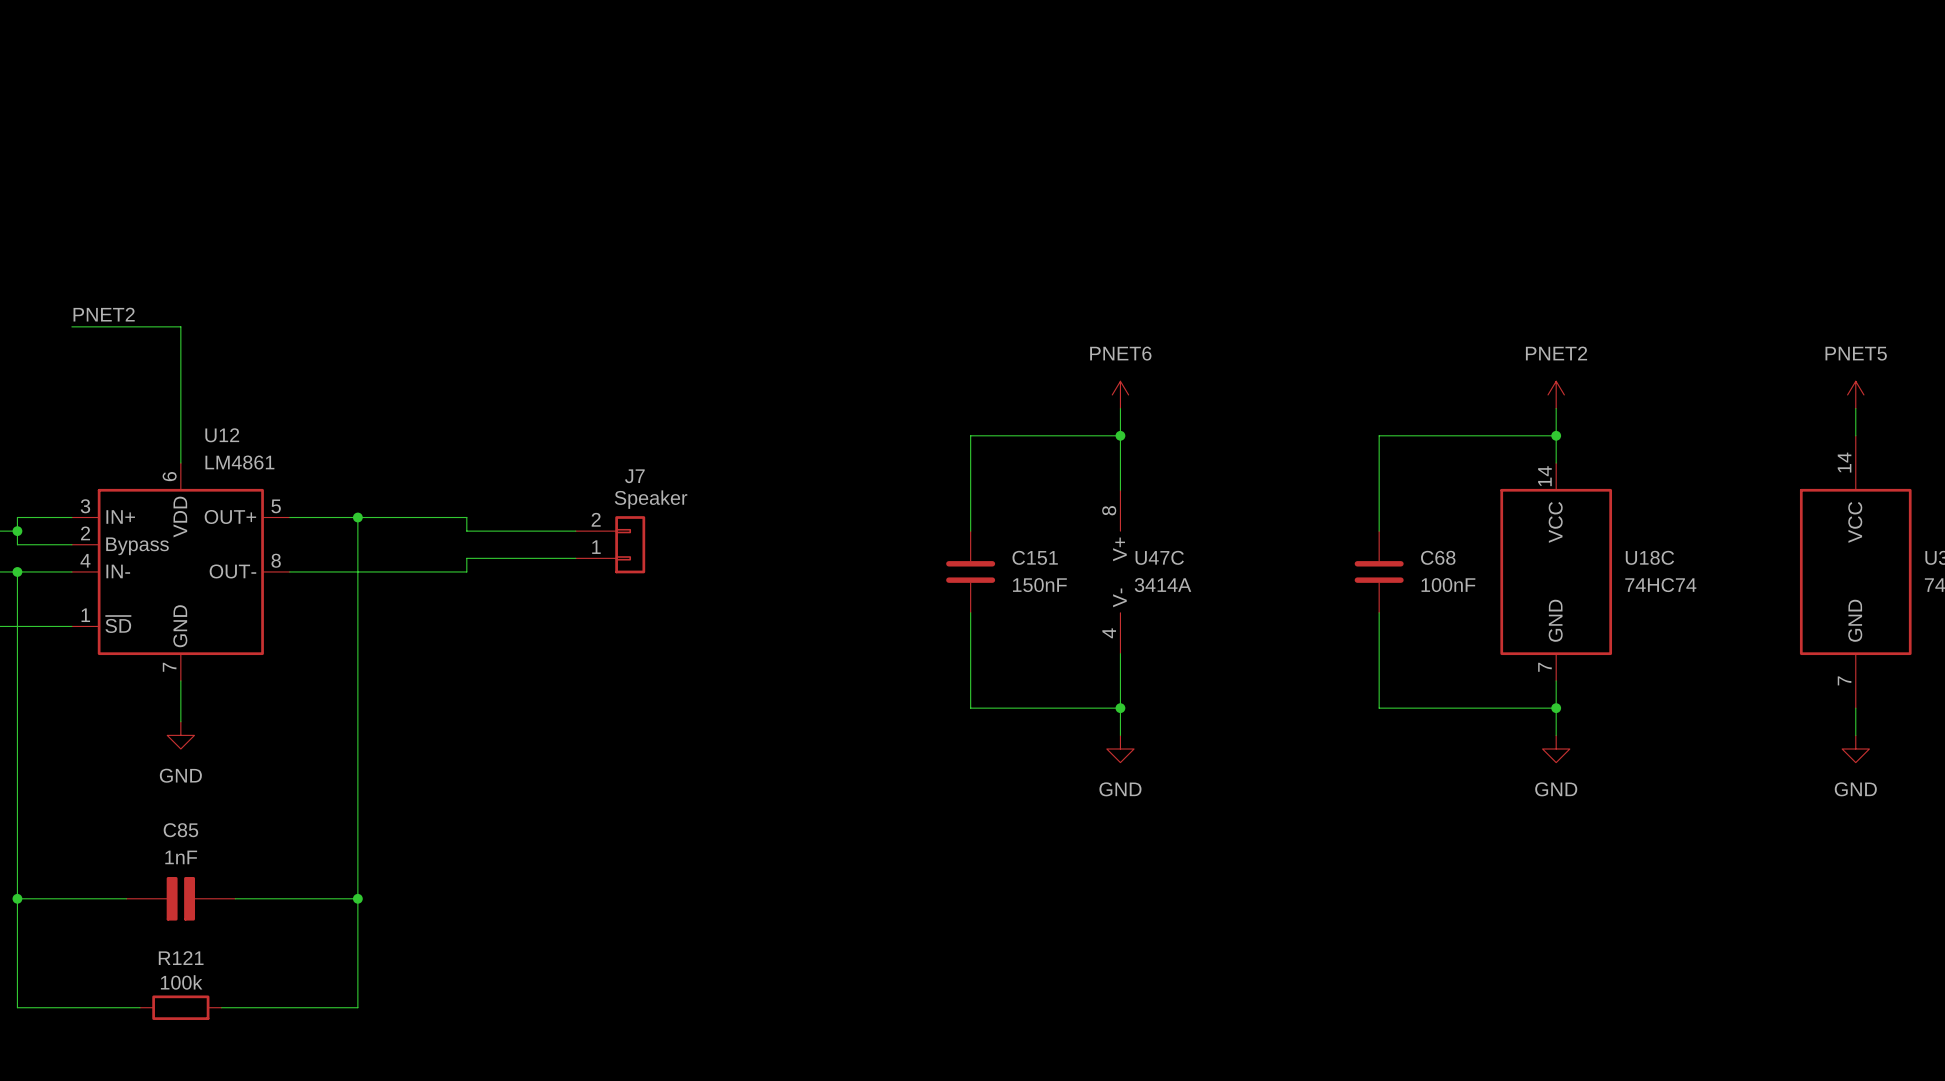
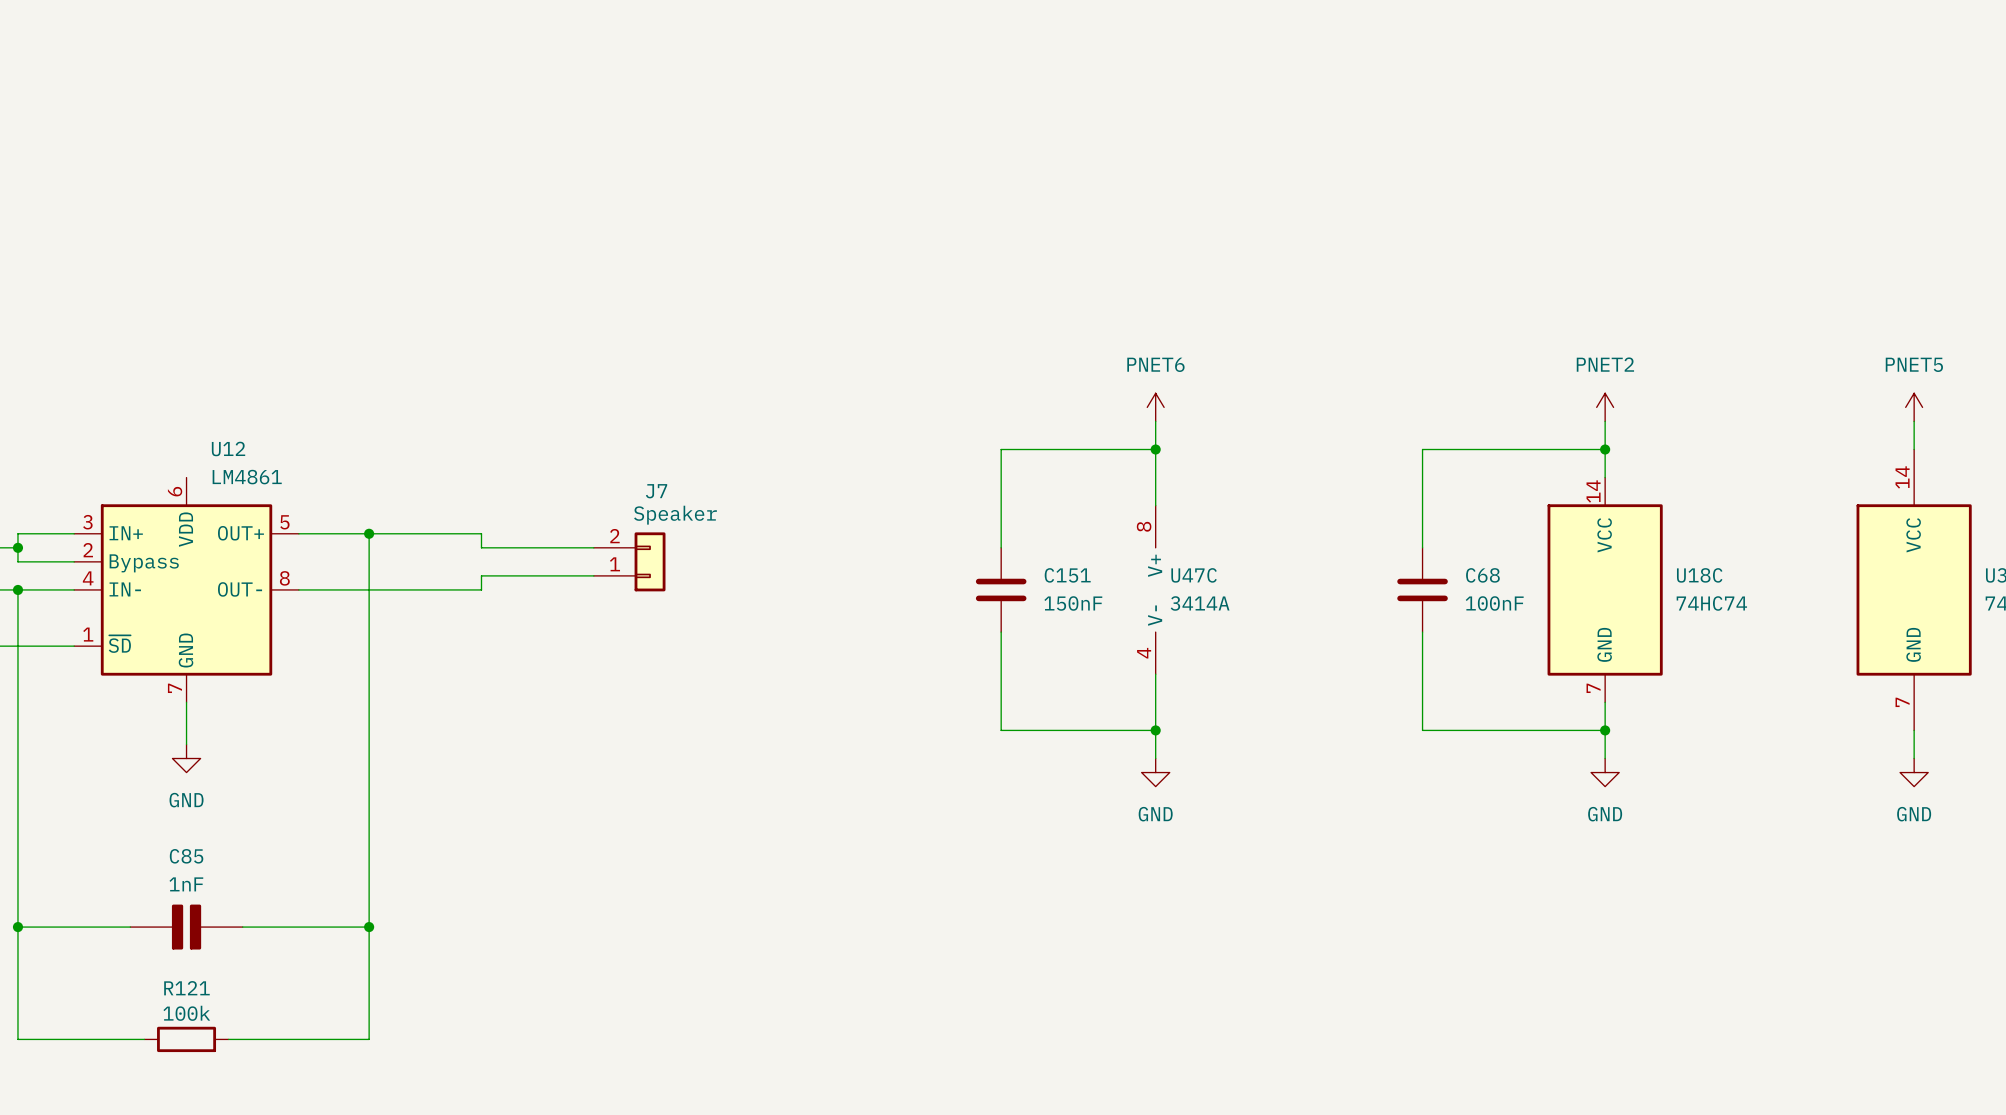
label: PNET2 (104, 314) -> none
wire: (71, 326) (180, 326) (180, 463) -> none

